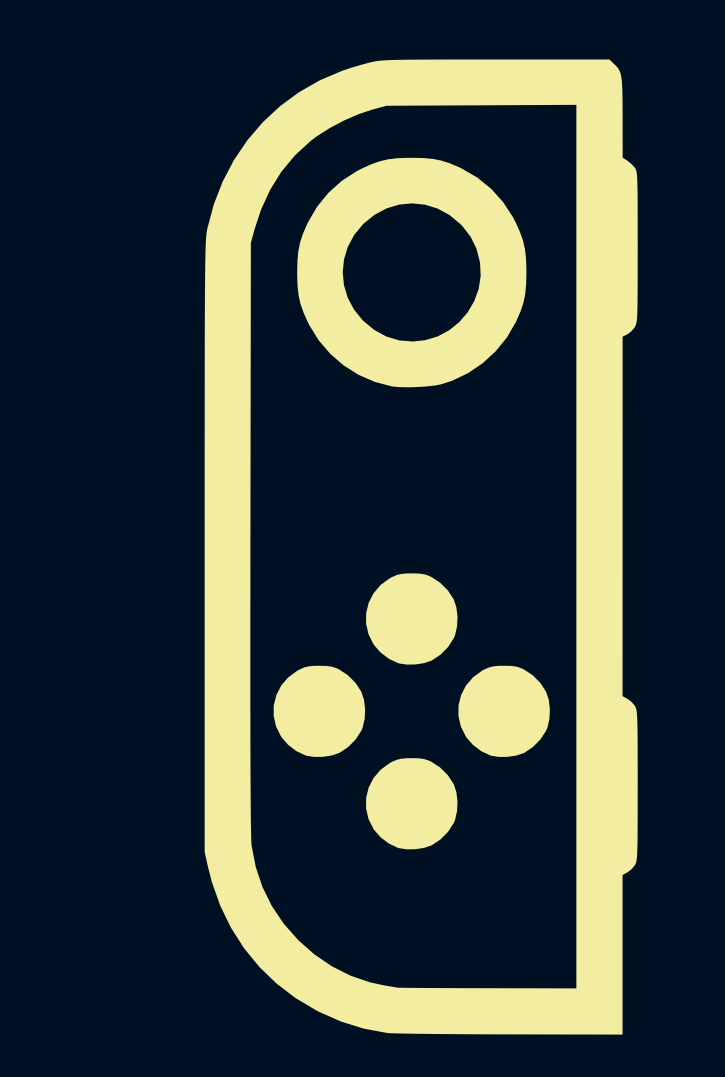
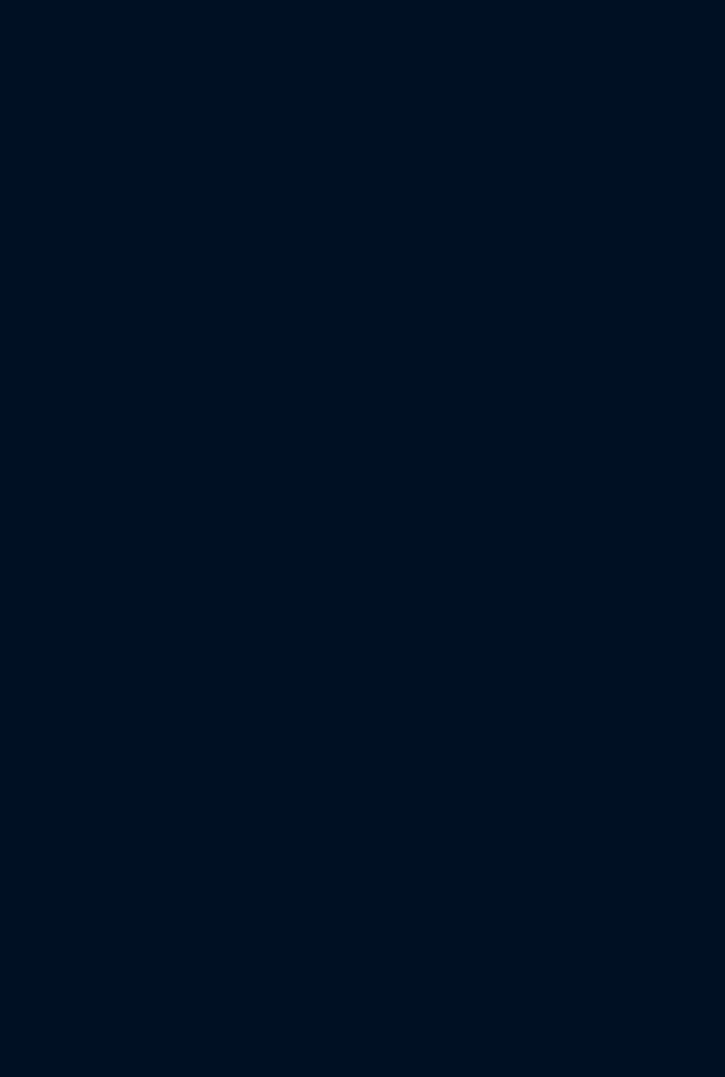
drawing: [204, 59, 638, 1035] -> none

